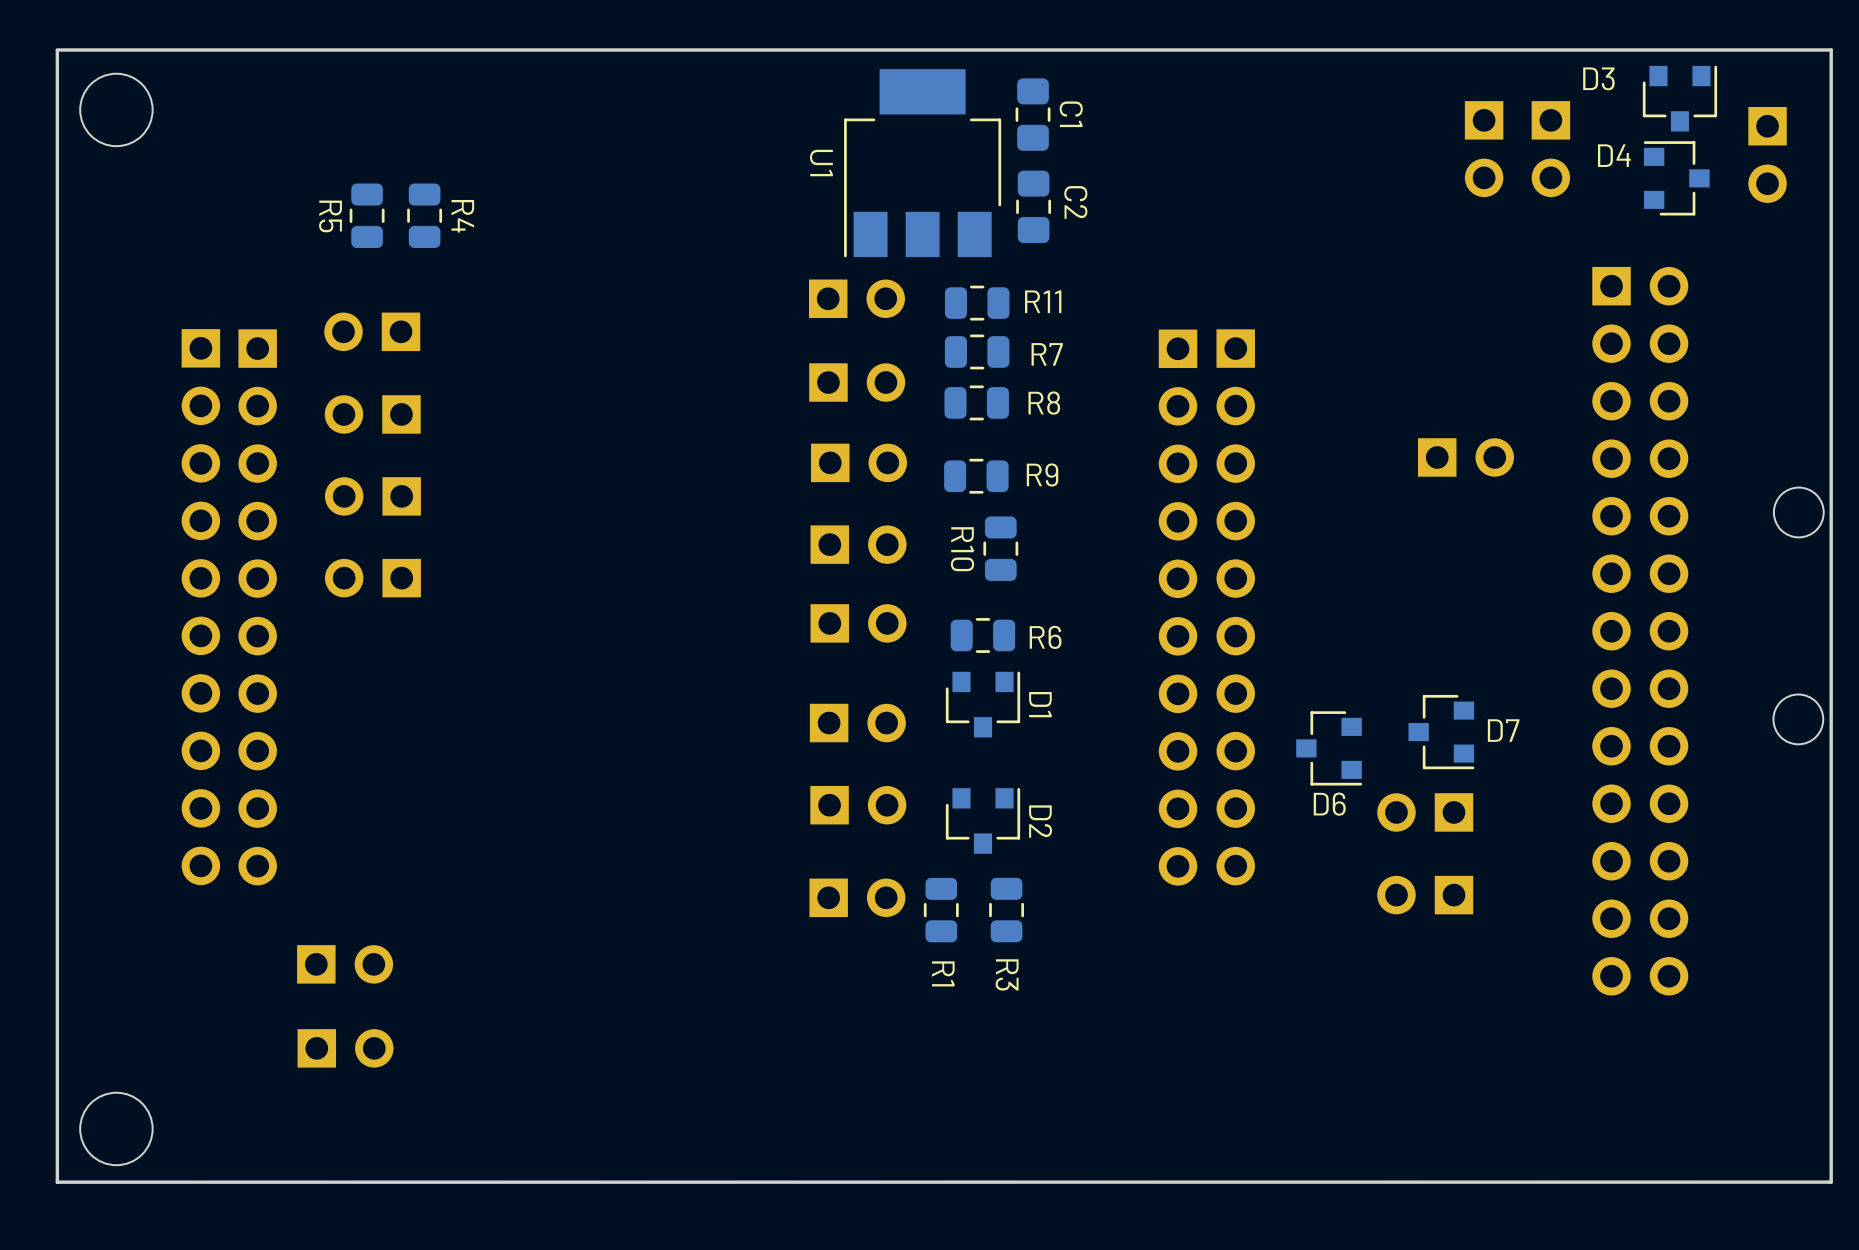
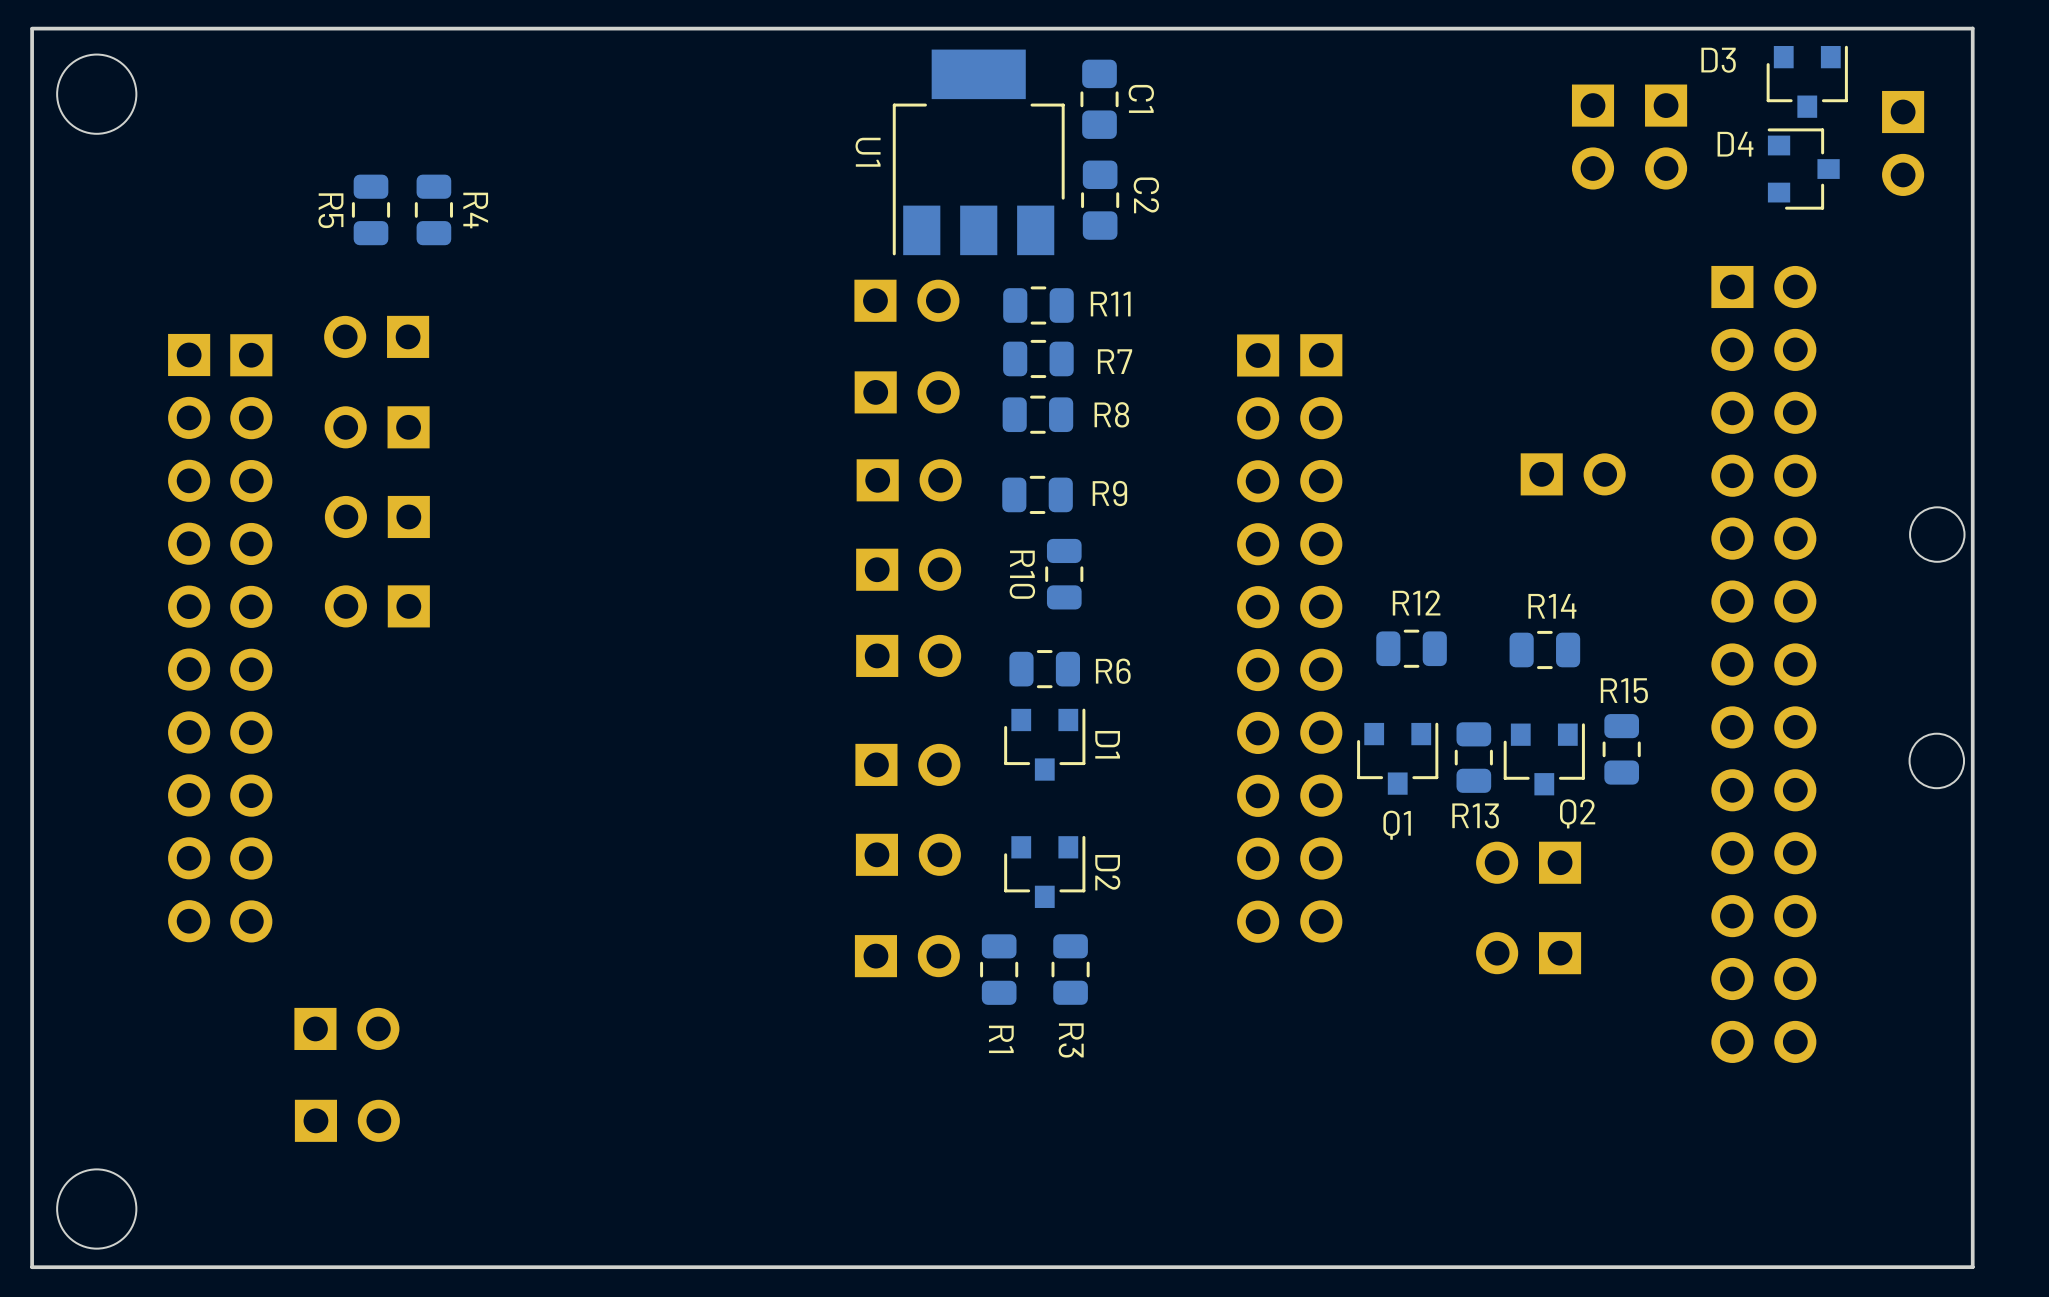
R12: none -> (1411, 648)
R14: none -> (1544, 649)
R15: none -> (1621, 749)
R13: none -> (1473, 757)
Q1: none -> (1397, 758)
Q2: none -> (1544, 759)
D7: (1441, 732) -> none
D6: (1329, 748) -> none

